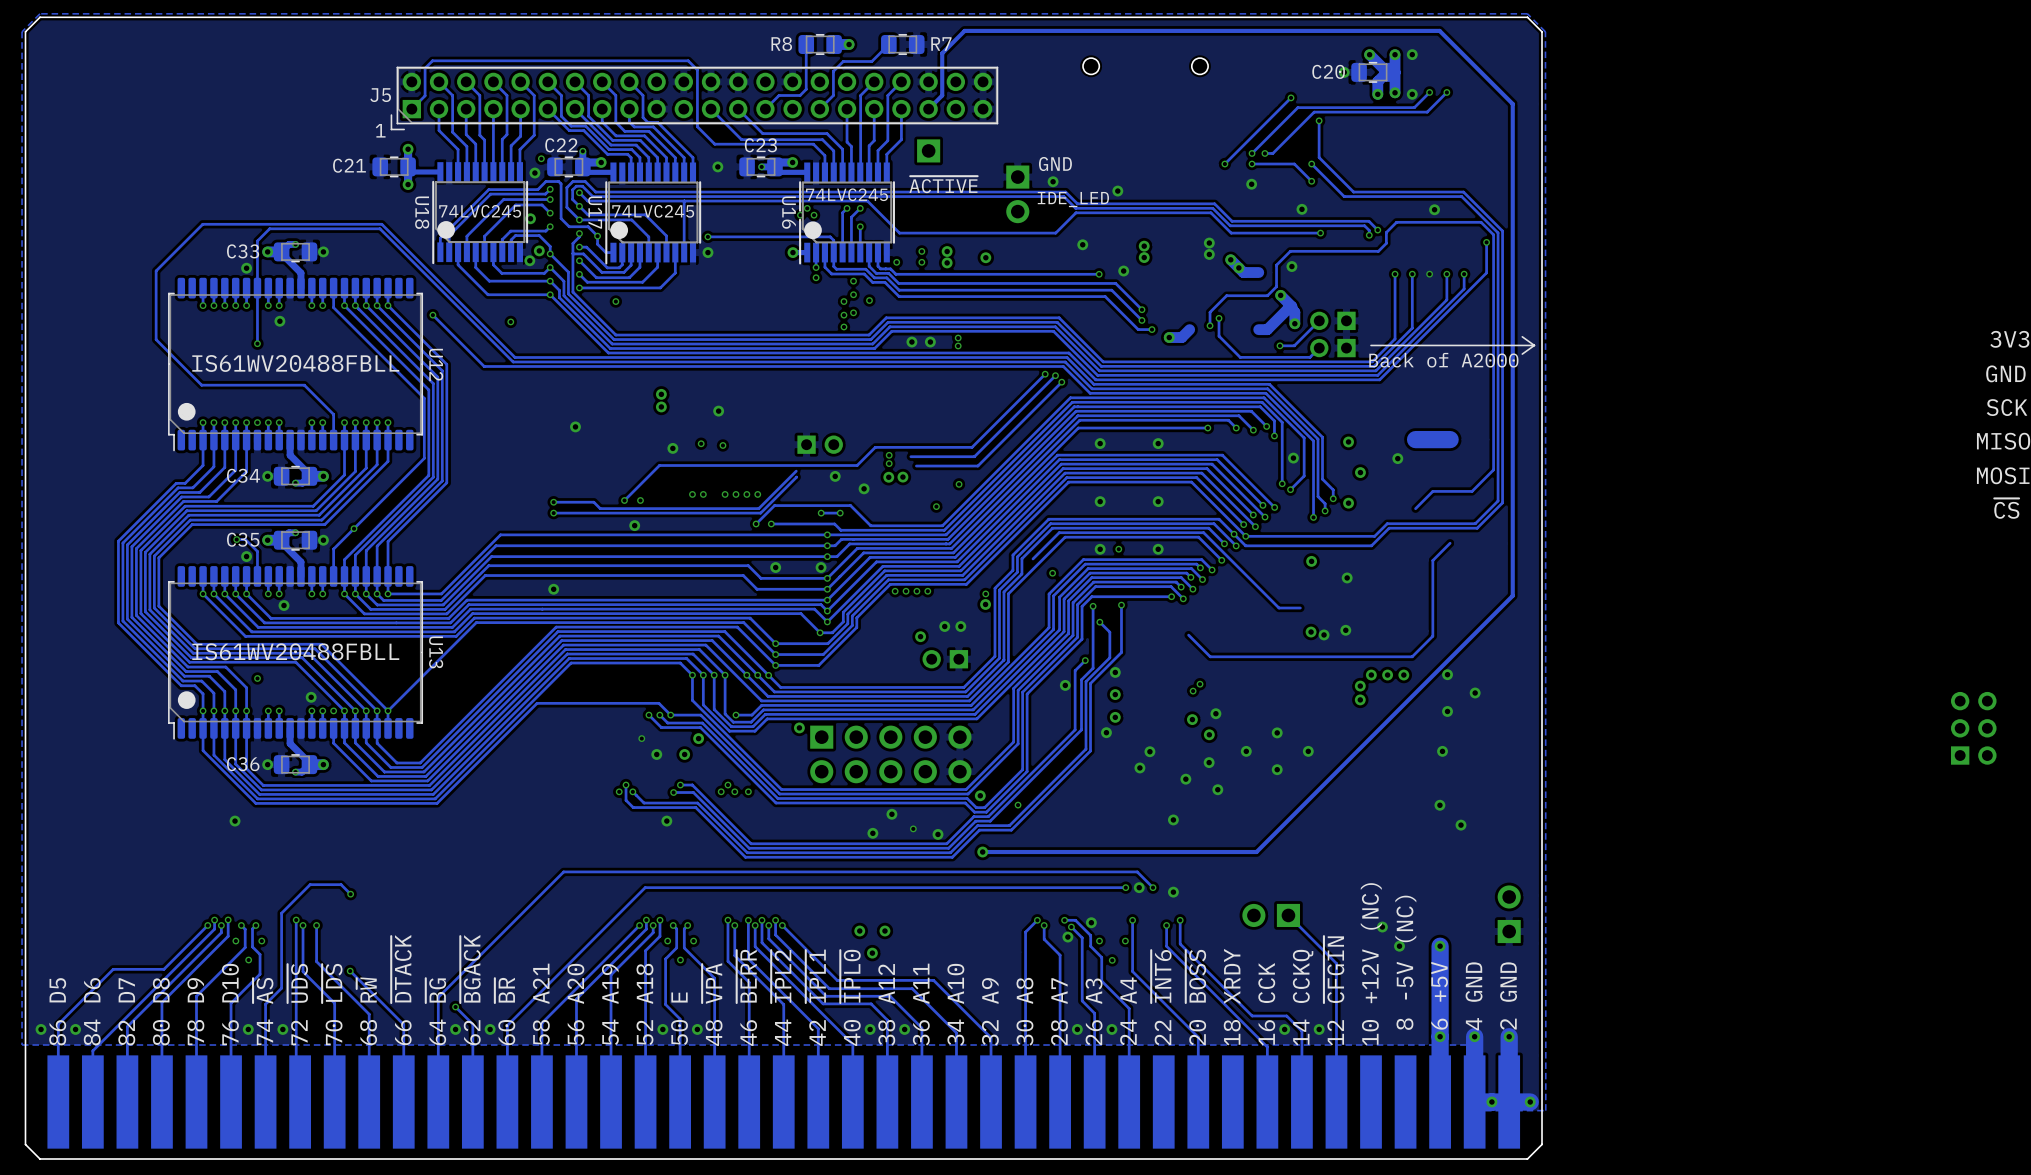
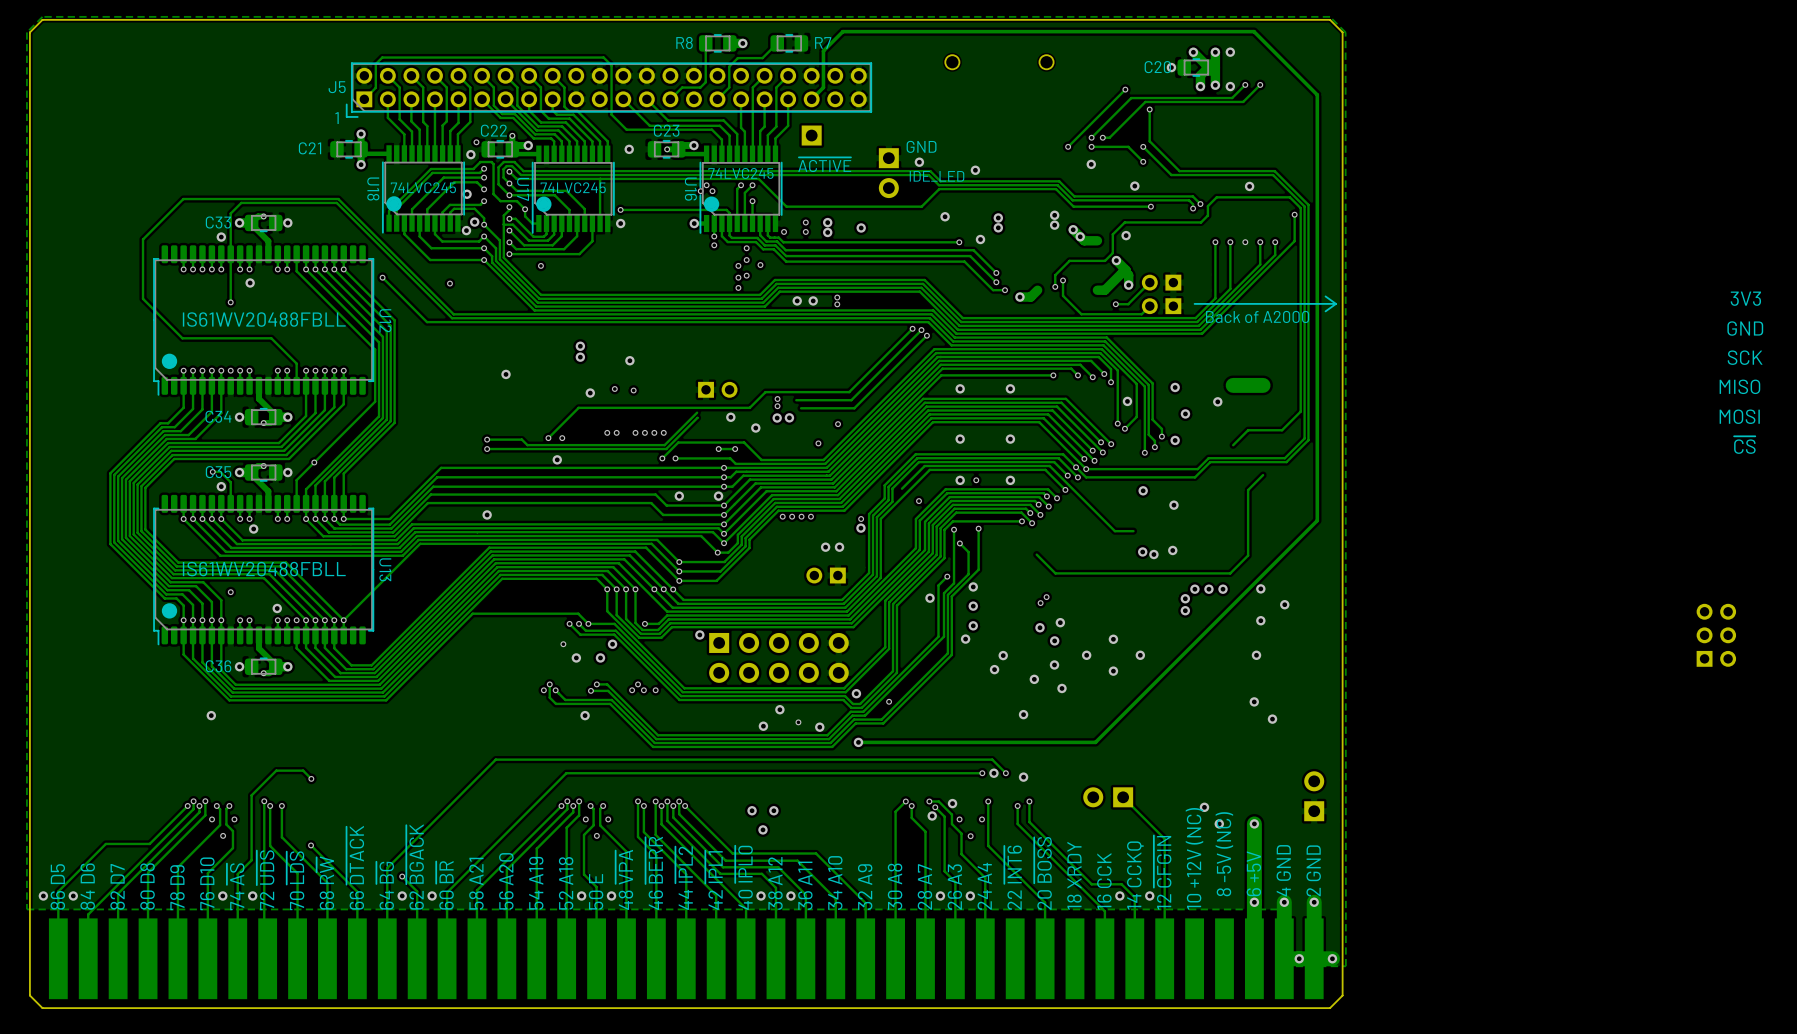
via: (920, 636) -> none

